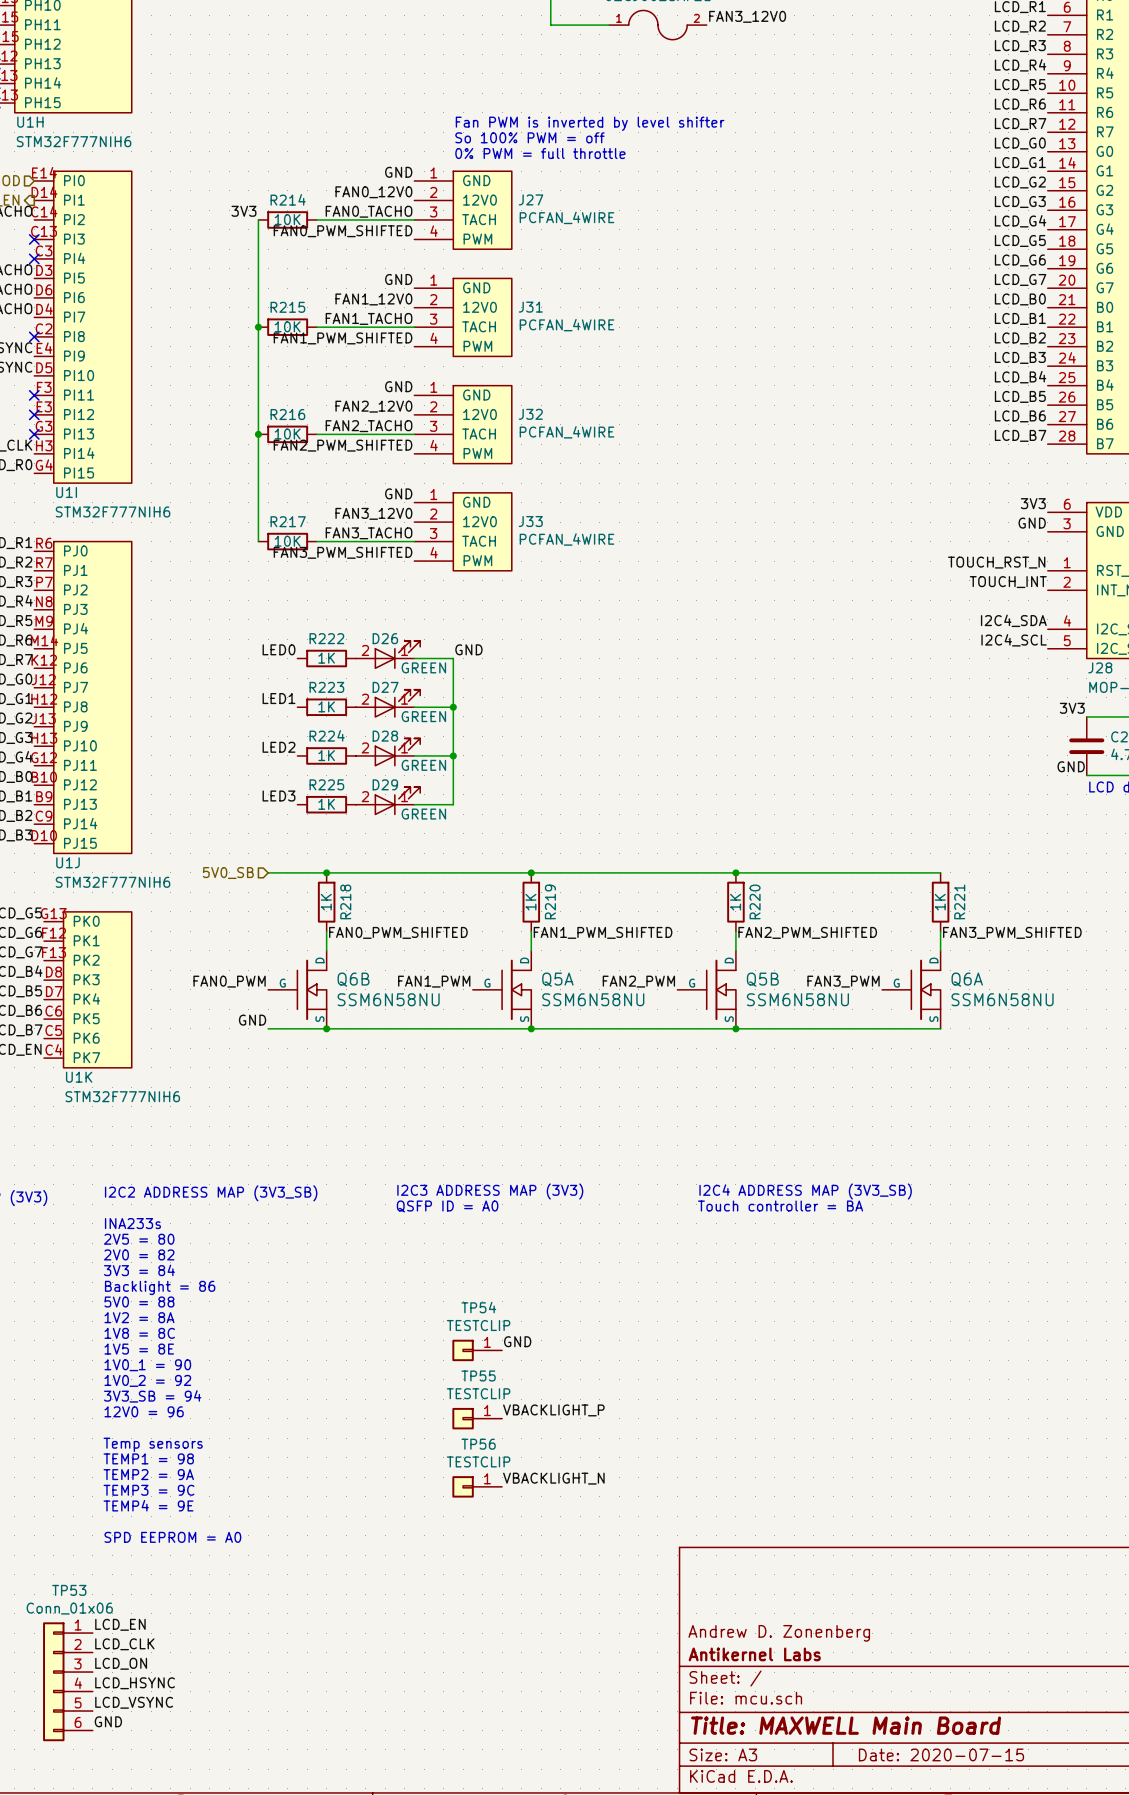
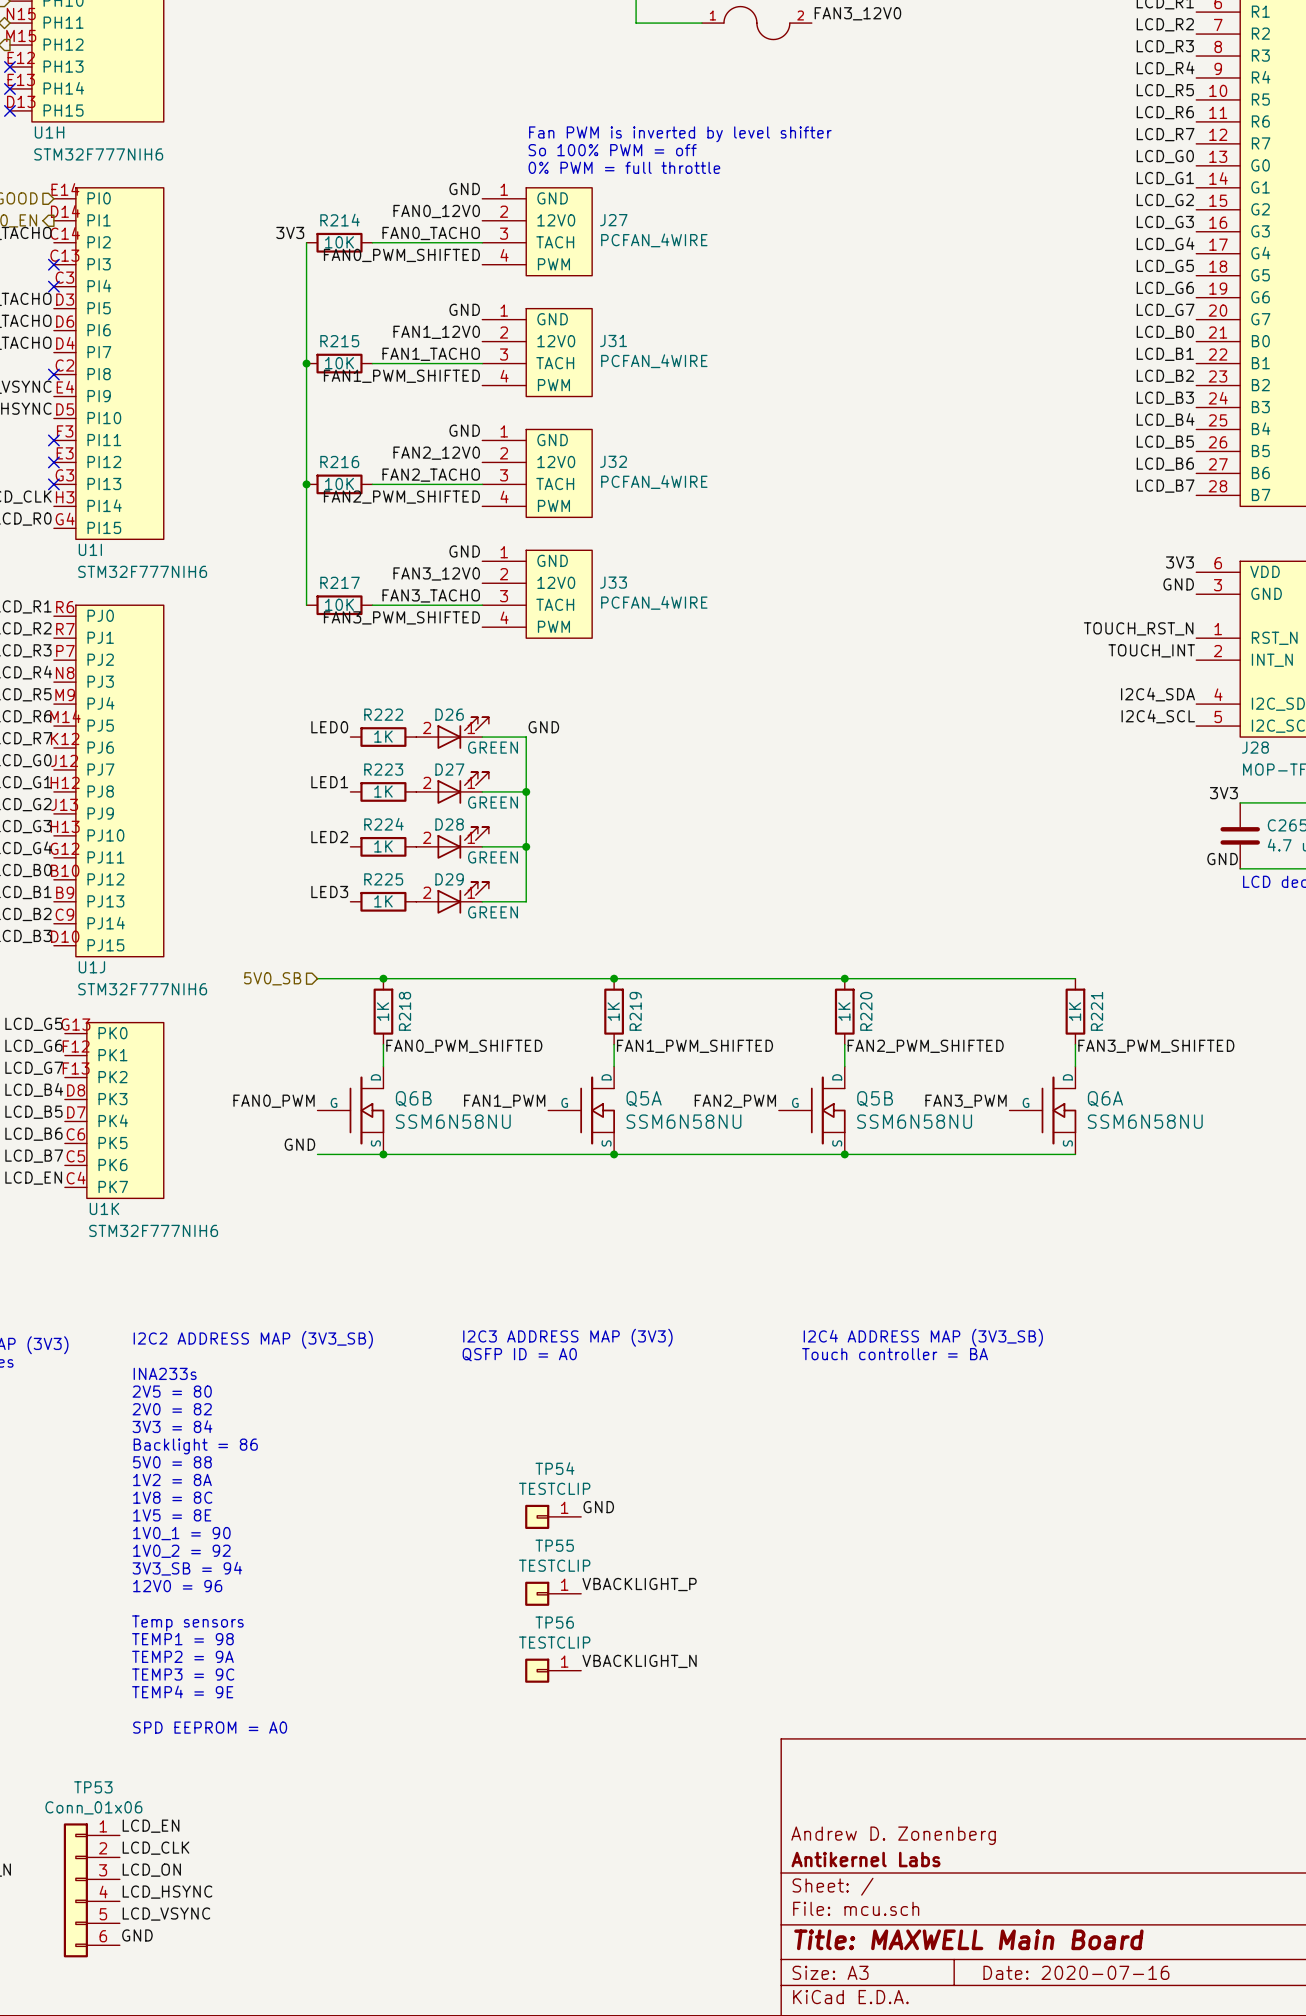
title block: Date: 2020-07-15 (941, 1754) -> Date: 2020-07-16 (1076, 1972)

